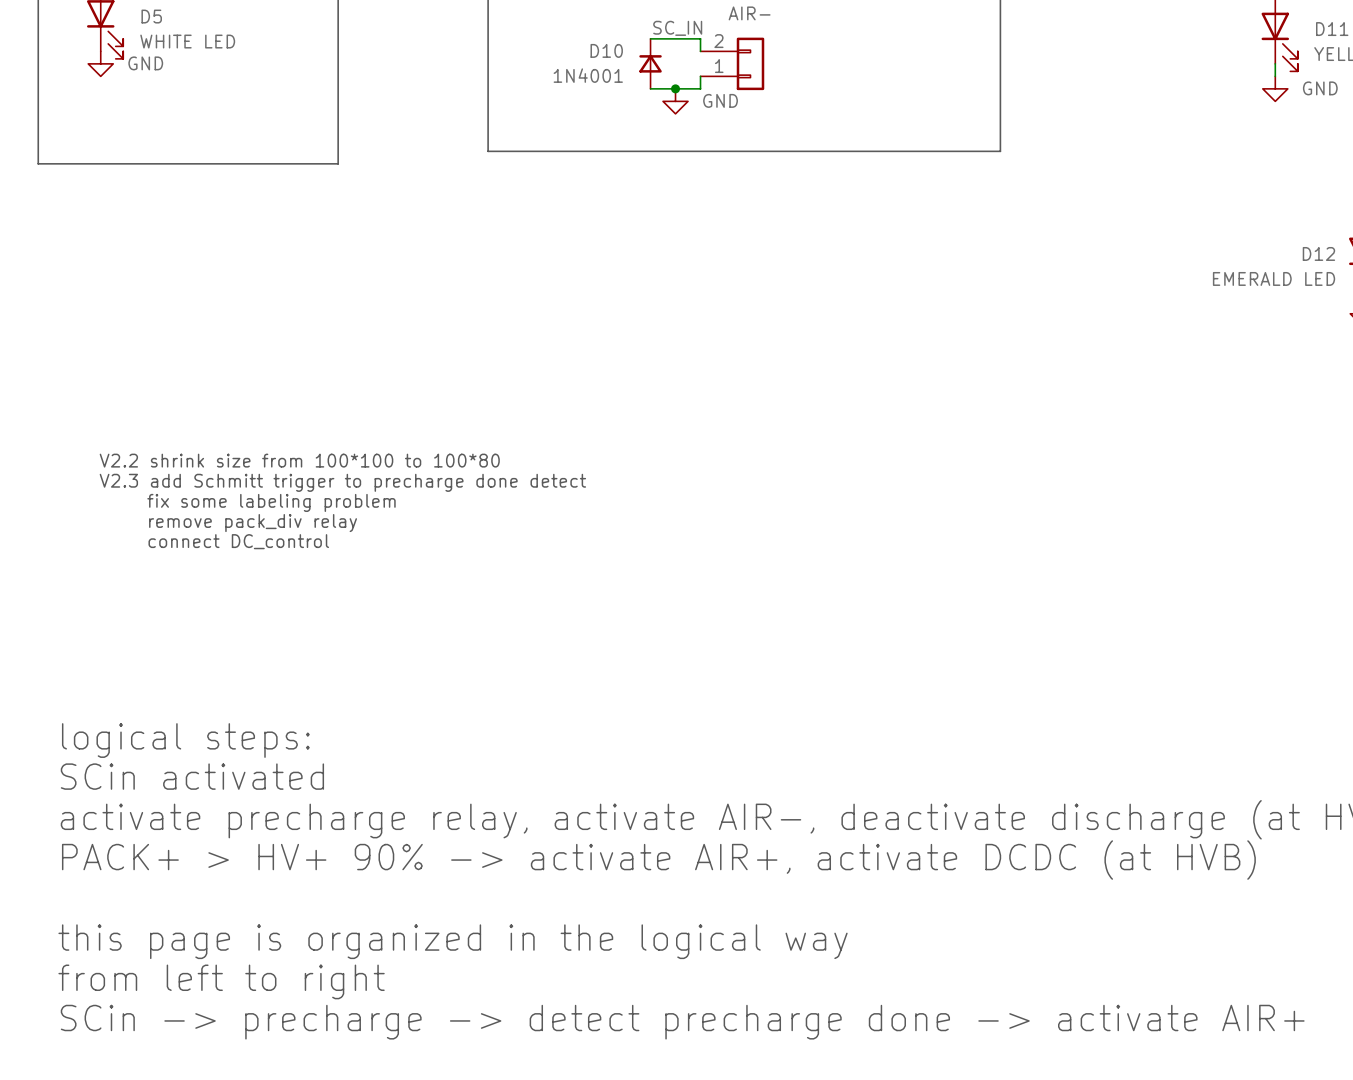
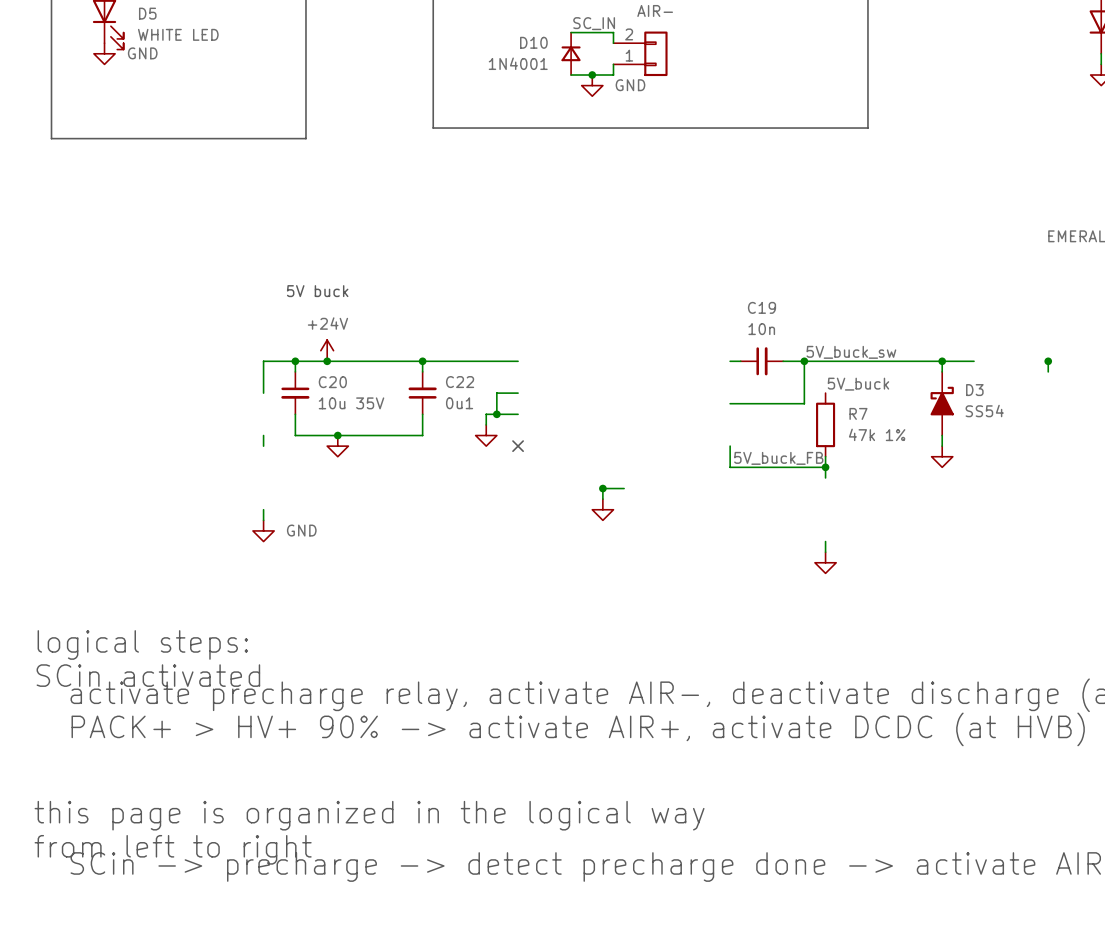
text: none -> 5V buck (317, 291)
power symbol: none -> +24V (327, 350)
label: none -> 5V_buck_sw (851, 352)
wire: none -> (295, 361) (295, 371)
junction: none -> (295, 361)
junction: none -> (327, 361)
wire: none -> (422, 361) (422, 371)
junction: none -> (422, 361)
wire: none -> (518, 361) (263, 361) (263, 393)
wire: none -> (730, 361) (740, 361)
C19: none -> 10n (761, 361)
wire: none -> (783, 361) (974, 361)
wire: none -> (804, 361) (804, 403) (730, 403)
junction: none -> (804, 361)
wire: none -> (942, 361) (942, 371)
junction: none -> (942, 361)
wire: none -> (1048, 361) (1048, 371)
junction: none -> (1048, 361)
label: none -> 5V_buck (858, 384)
text: V2.2 shrink size from 100*100 to 100*80 (299, 460) -> none
C20: none -> 10u 35V (295, 393)
C22: none -> 0u1 (422, 393)
wire: none -> (518, 393) (496, 393) (496, 414)
D3: none -> SS54 (942, 403)
text: V2.3 add Schmitt trigger to precharge done detect (342, 482) -> none
wire: none -> (295, 414) (295, 435) (422, 435) (422, 414)
junction: none -> (496, 414)
wire: none -> (518, 414) (486, 414) (486, 424)
R7: none -> 47k 1% (825, 424)
text: fix some labeling problem (271, 502) -> none
wire: none -> (263, 435) (263, 446)
junction: none -> (337, 435)
power symbol: none -> (486, 435)
wire: none -> (942, 435) (942, 446)
text: remove pack_div relay (253, 523) -> none
power symbol: none -> (337, 446)
no-connect mark: none -> (518, 446)
wire: none -> (730, 446) (730, 467) (825, 467)
wire: none -> (825, 456) (825, 477)
power symbol: none -> (942, 456)
label: none -> 5V_buck_FB (778, 458)
text: connect DC_control (238, 541) -> none
junction: none -> (825, 467)
junction: none -> (602, 488)
wire: none -> (624, 488) (602, 488) (602, 499)
wire: none -> (263, 509) (263, 520)
power symbol: none -> (602, 509)
power symbol: none -> GND (263, 530)
wire: none -> (825, 541) (825, 552)
power symbol: none -> (825, 562)
text position: logical steps: (185, 740) -> logical steps: (142, 644)
text position: SCin activated (192, 776) -> SCin activated (148, 675)
text position: this page is organized in the logical way (453, 941) -> this page is organized in the logical way (369, 815)
text position: from left to right (221, 981) -> from left to right (173, 849)

